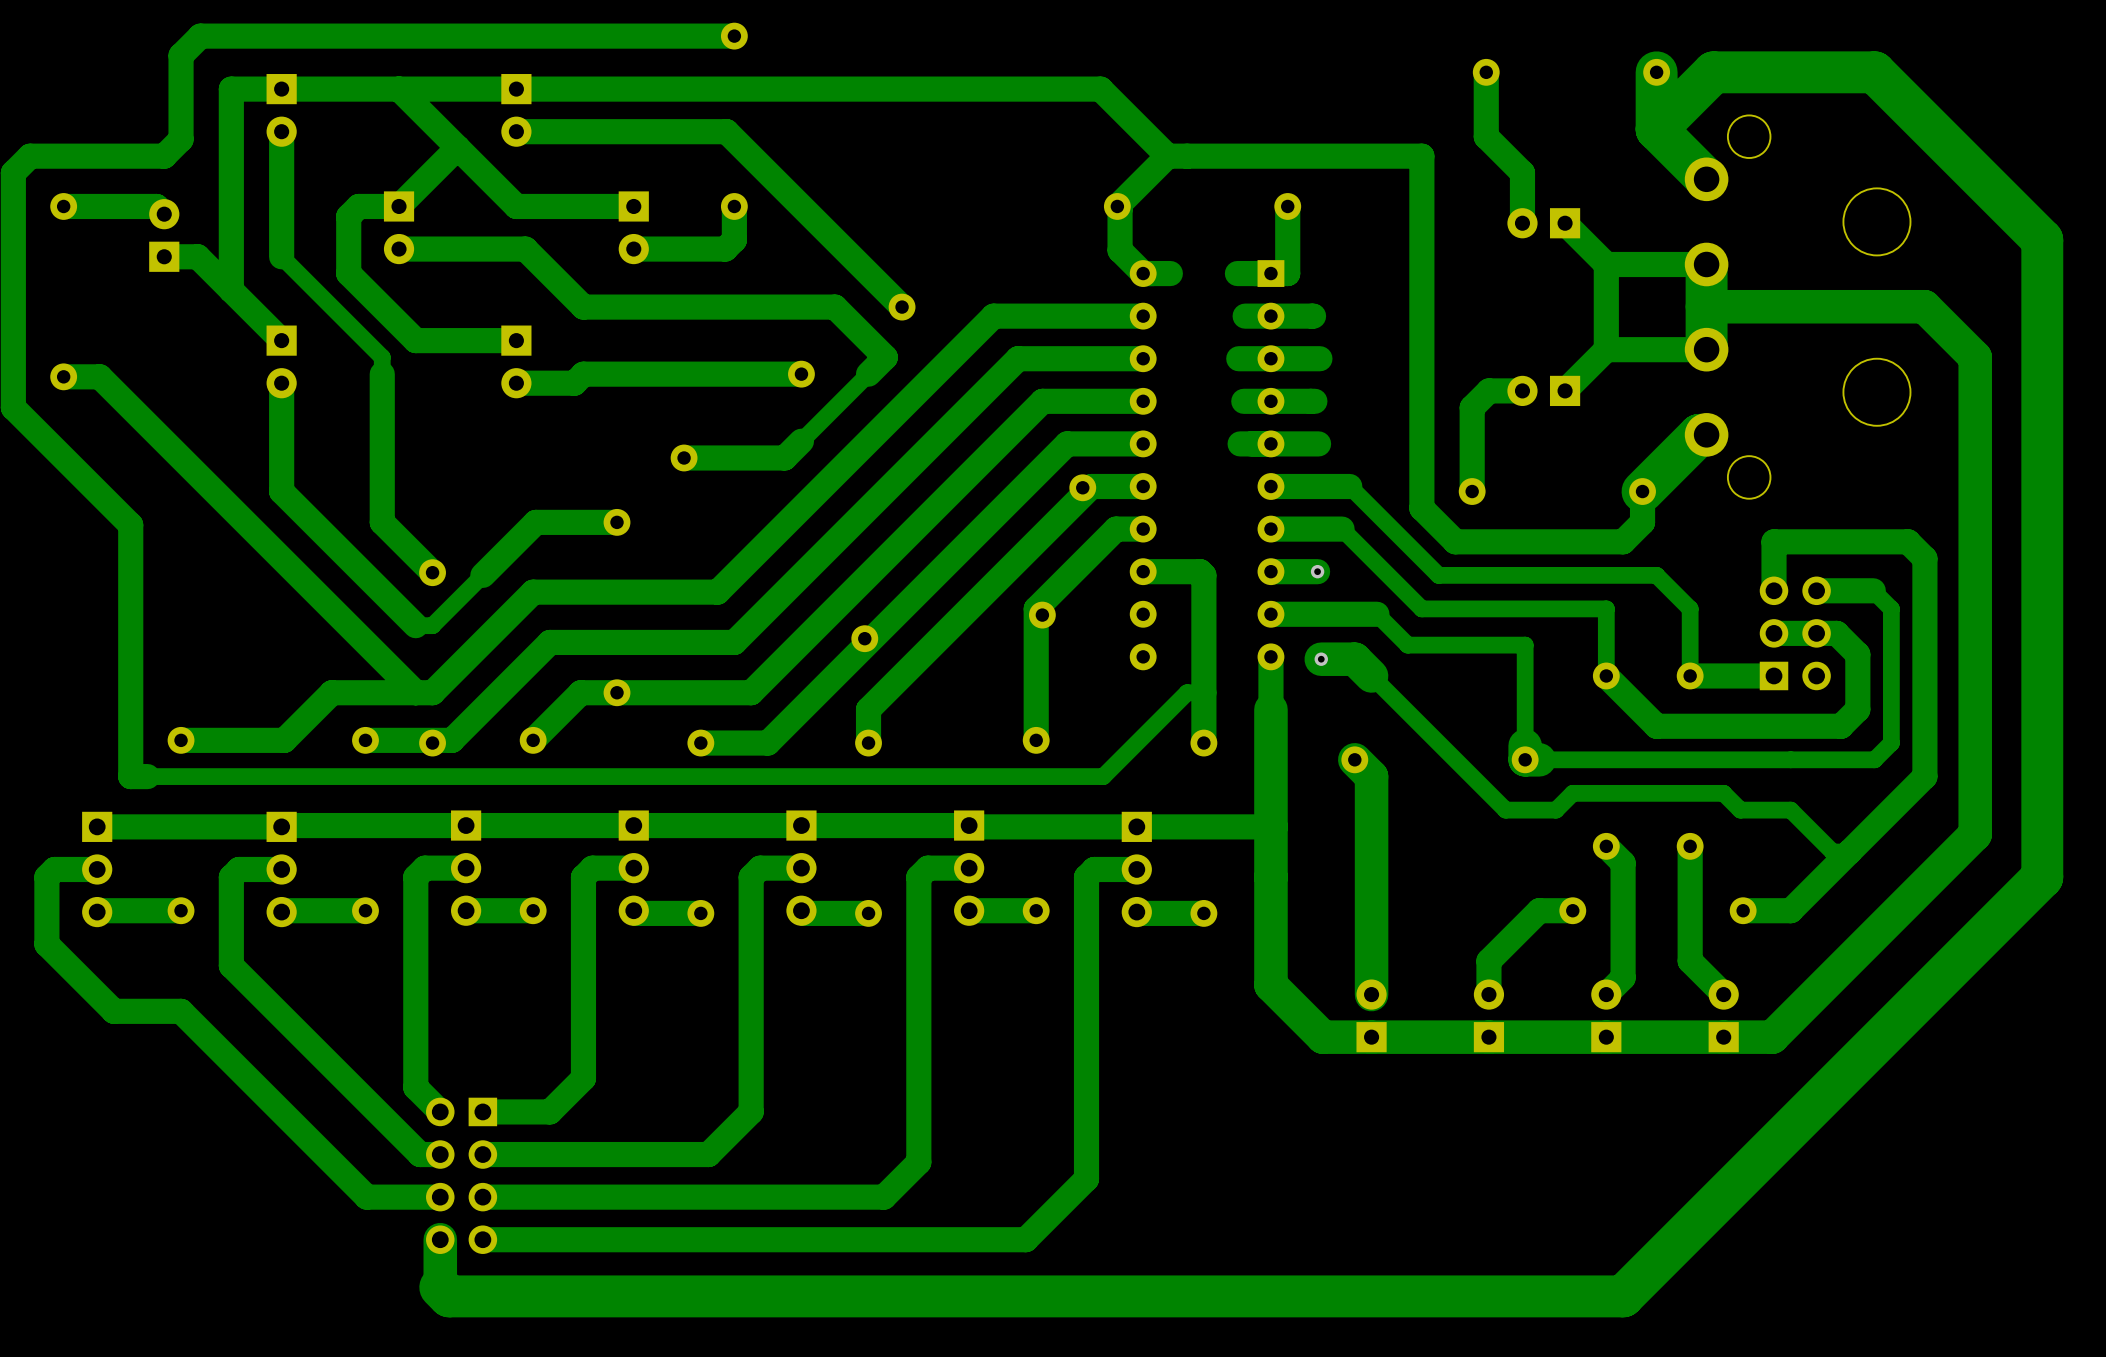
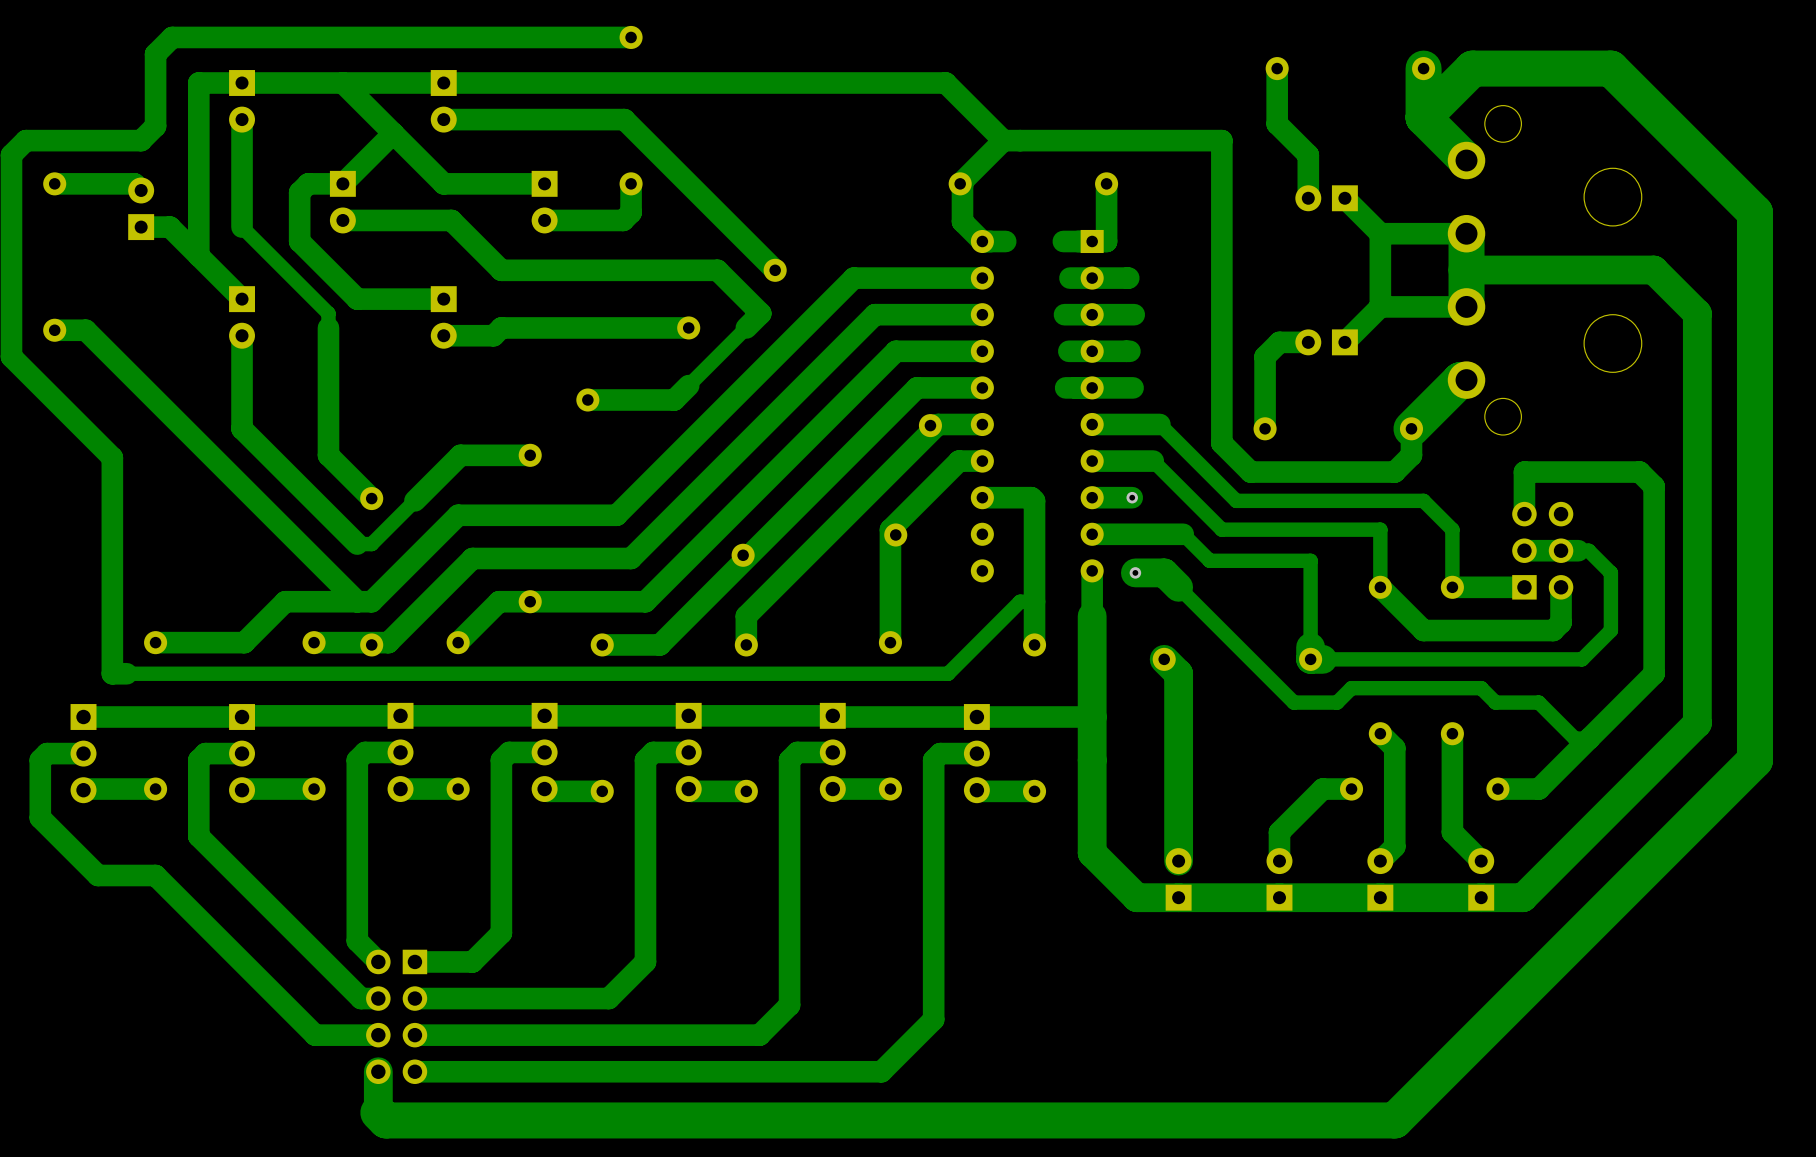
bottom track: (1816, 590) (1873, 590) (1891, 608) (1891, 743) (1874, 759) (1841, 759) -> (1578, 550) (1588, 550) (1610, 572) (1610, 630) (1582, 659)
bottom track: (1836, 633) (1857, 654) (1857, 709) (1841, 726) (1807, 726) -> (1561, 587) (1561, 622) (1553, 630)

